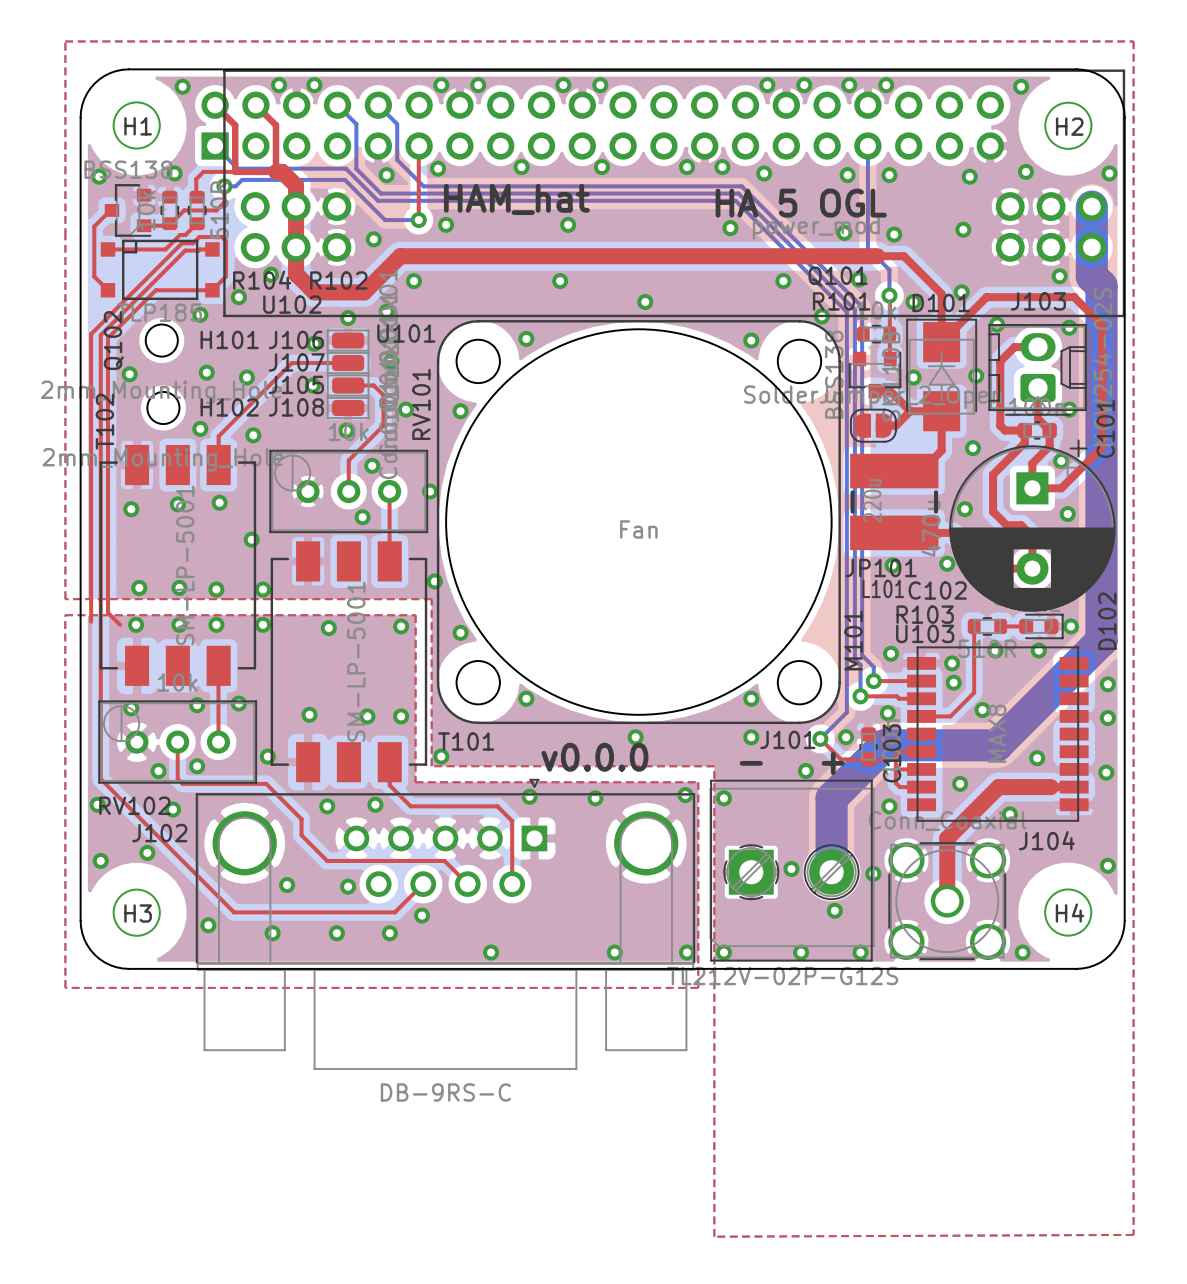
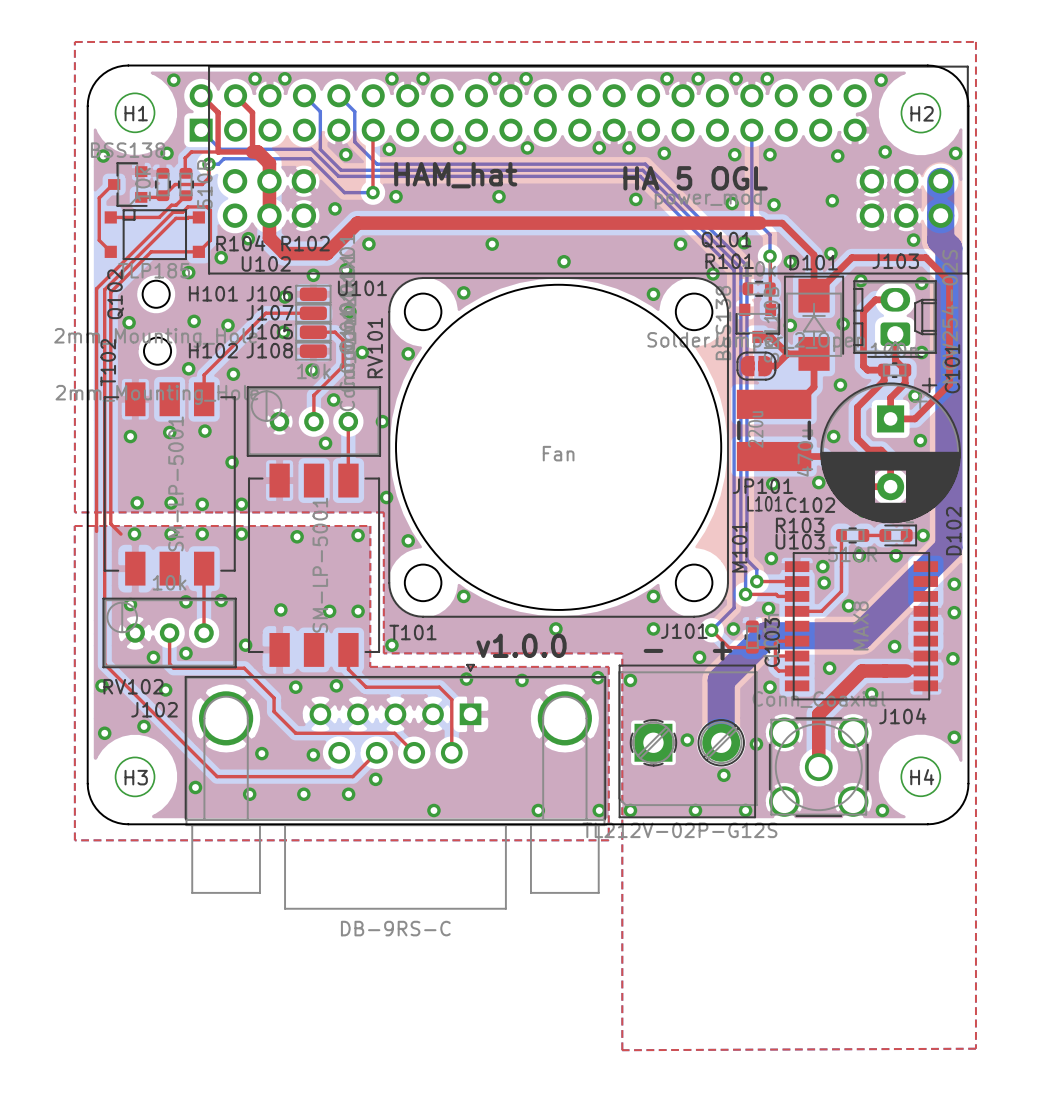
text: v0.0.0 (594, 757) -> v1.0.0 (521, 645)

